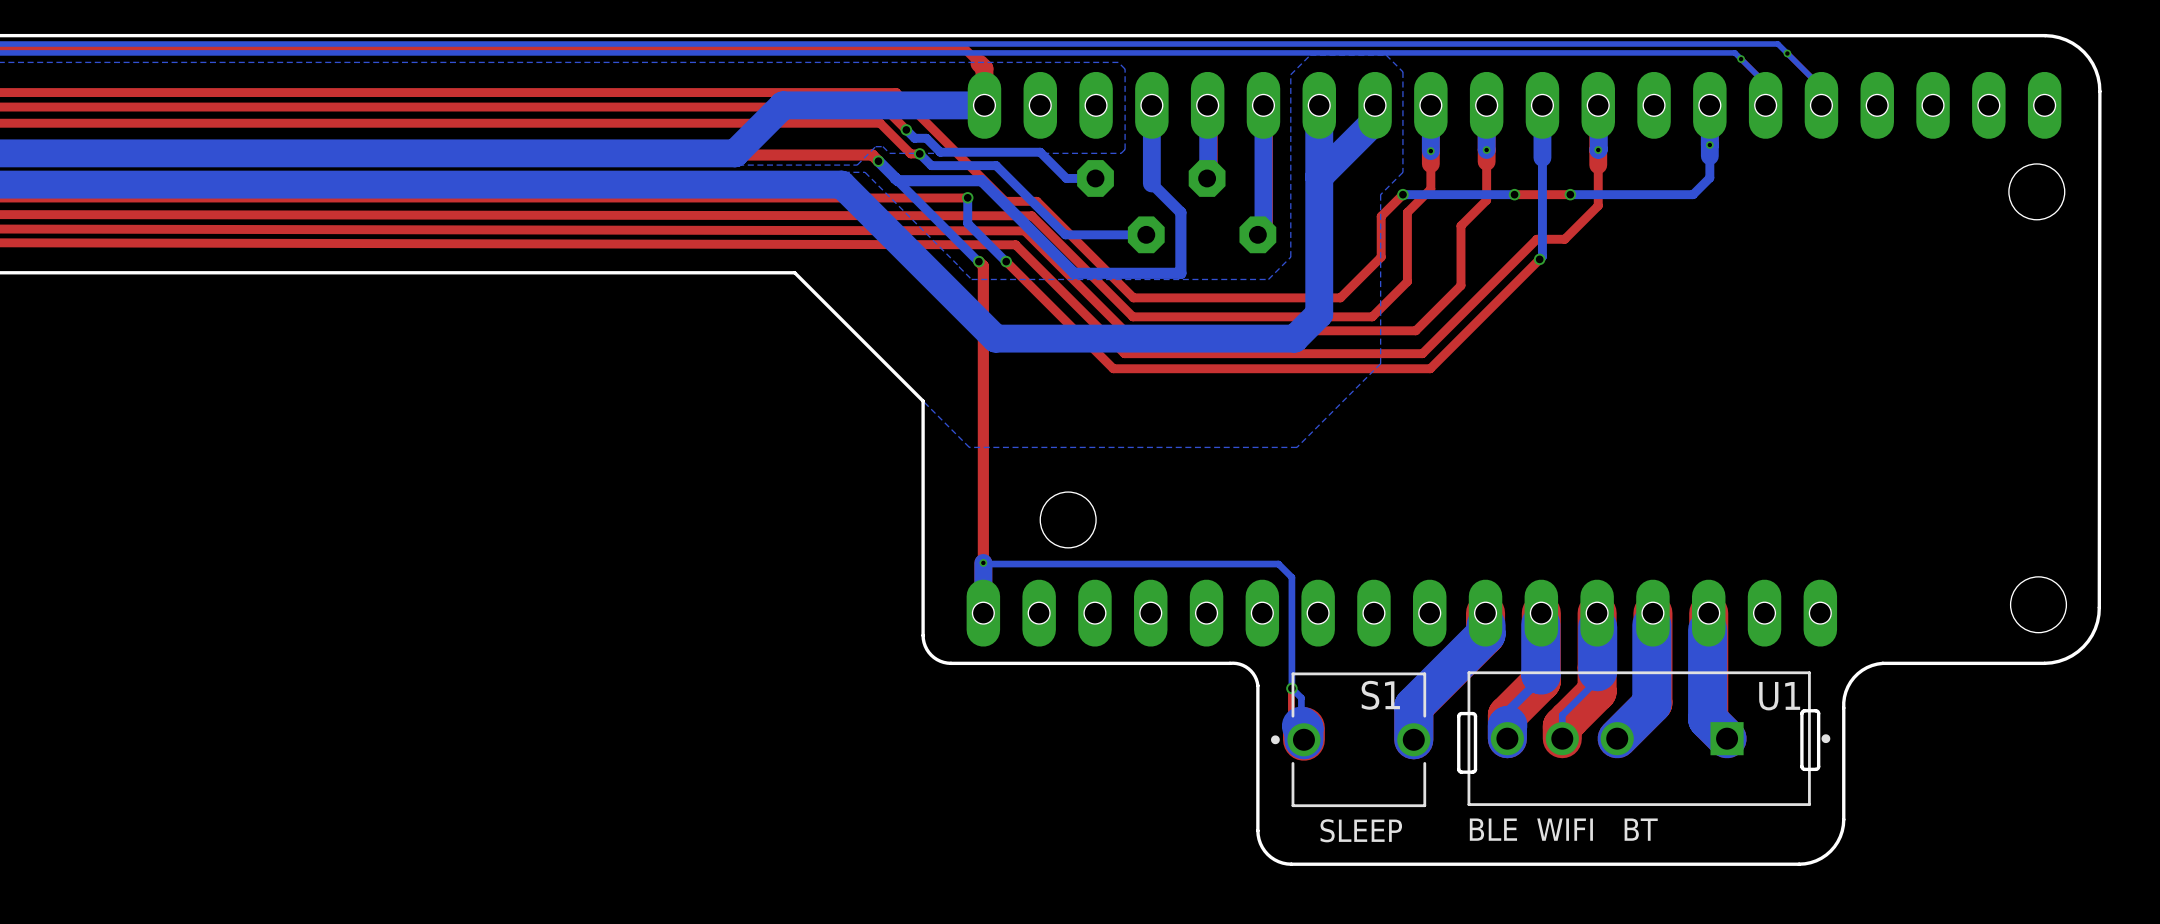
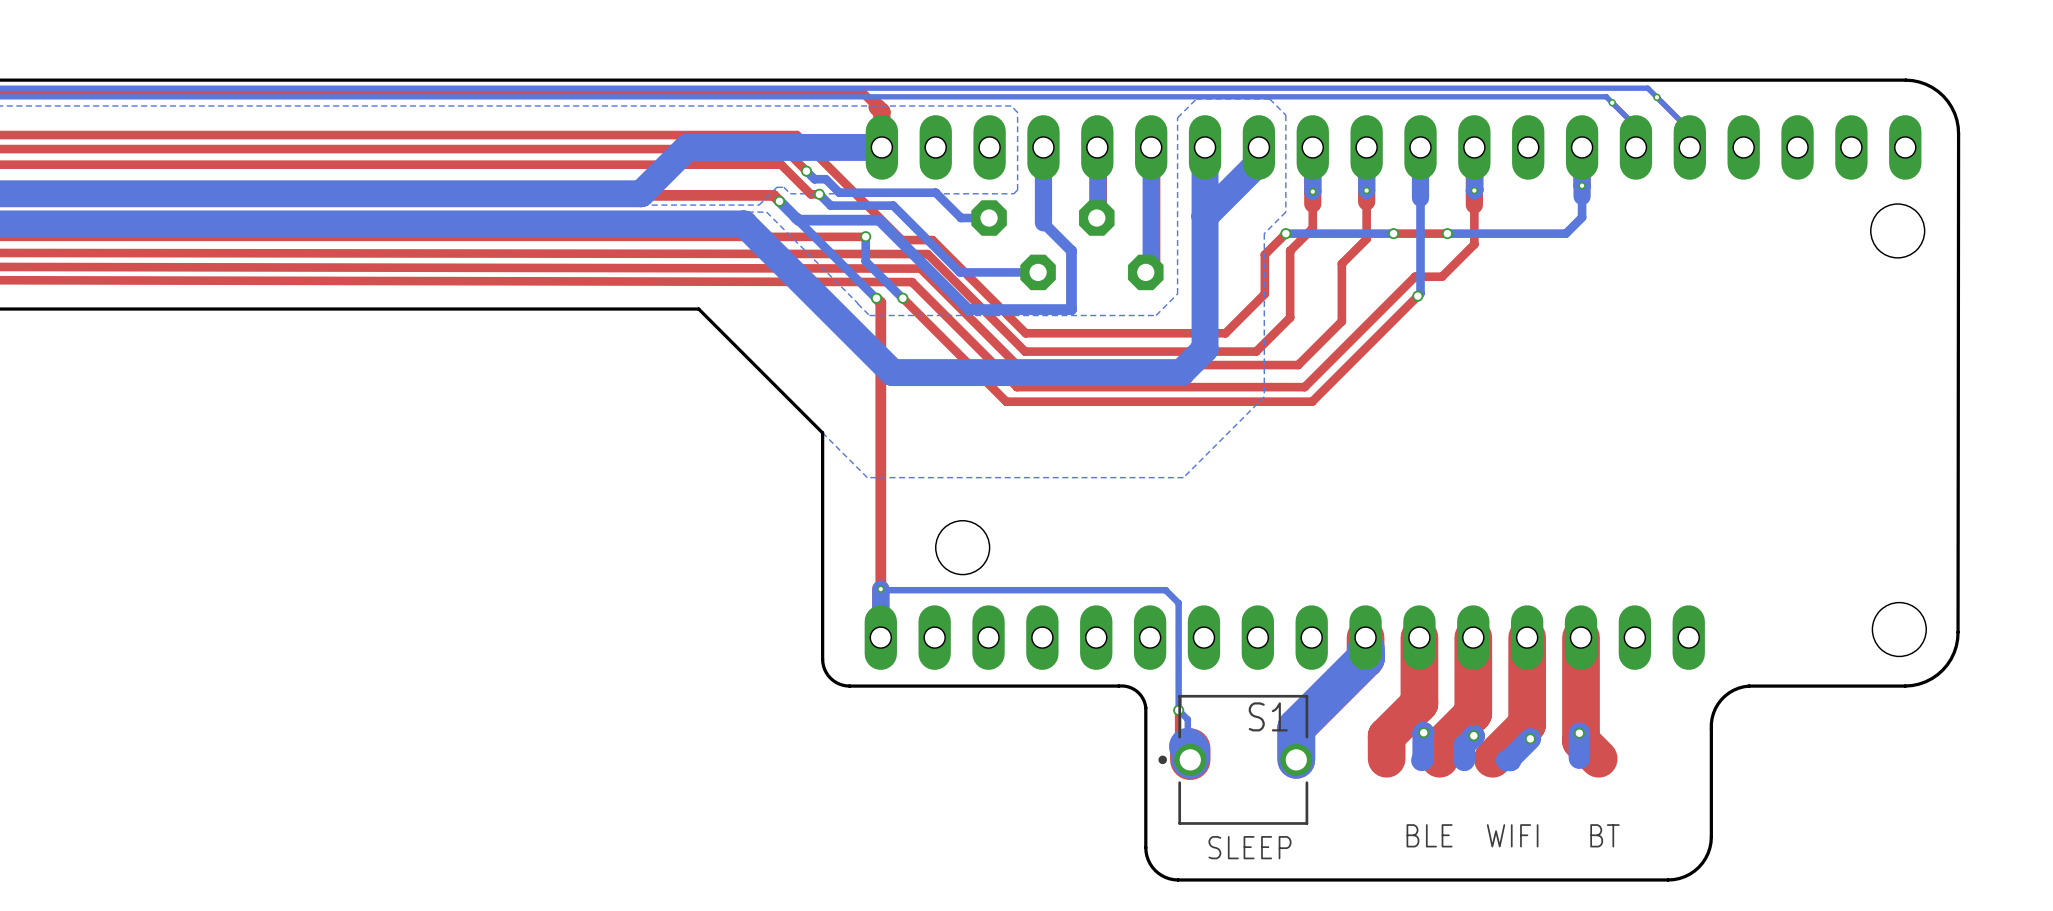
bottom track: (1540, 624) (1541, 677) (1507, 711) (1507, 738) -> none
bottom track: (1651, 624) (1651, 704) (1617, 738) -> none
bottom track: (1597, 627) (1597, 679) (1562, 715) (1562, 738) -> none
bottom track: (1707, 629) (1707, 719) (1727, 738) -> none
board edge: (1815, 710) (1804, 710) (1802, 712) (1801, 766) (1803, 769) (1816, 769) (1818, 767) (1818, 713) (1815, 710) -> none
bottom track: none -> (1423, 732) (1421, 760)
via: none -> (1423, 732)
bottom track: none -> (1579, 733) (1579, 758)
via: none -> (1579, 733)
board edge: (1472, 713) (1461, 713) (1458, 715) (1458, 769) (1460, 772) (1473, 772) (1475, 770) (1475, 716) (1472, 713) -> none
via: none -> (1473, 735)
bottom track: none -> (1474, 736) (1464, 745) (1464, 760)
bottom track: none -> (1530, 738) (1510, 760) (1506, 760)
via: none -> (1530, 738)
U1: (1648, 738) -> none
text position: BLE WIFI BT (1563, 829) -> BLE WIFI BT (1513, 835)

